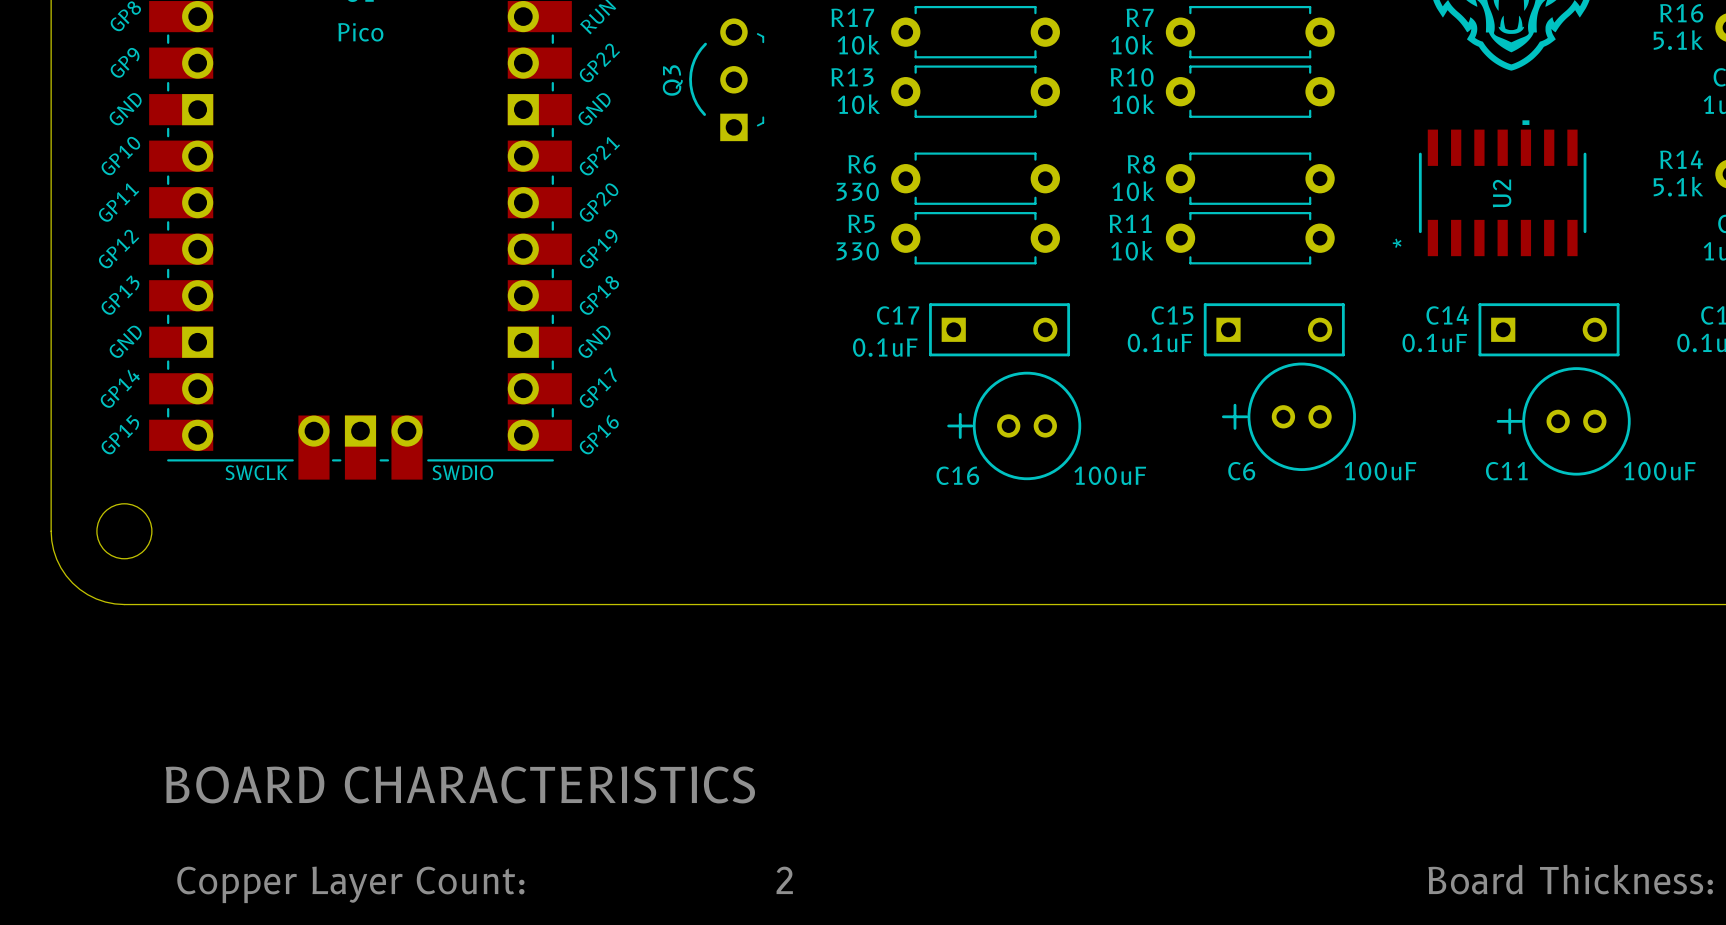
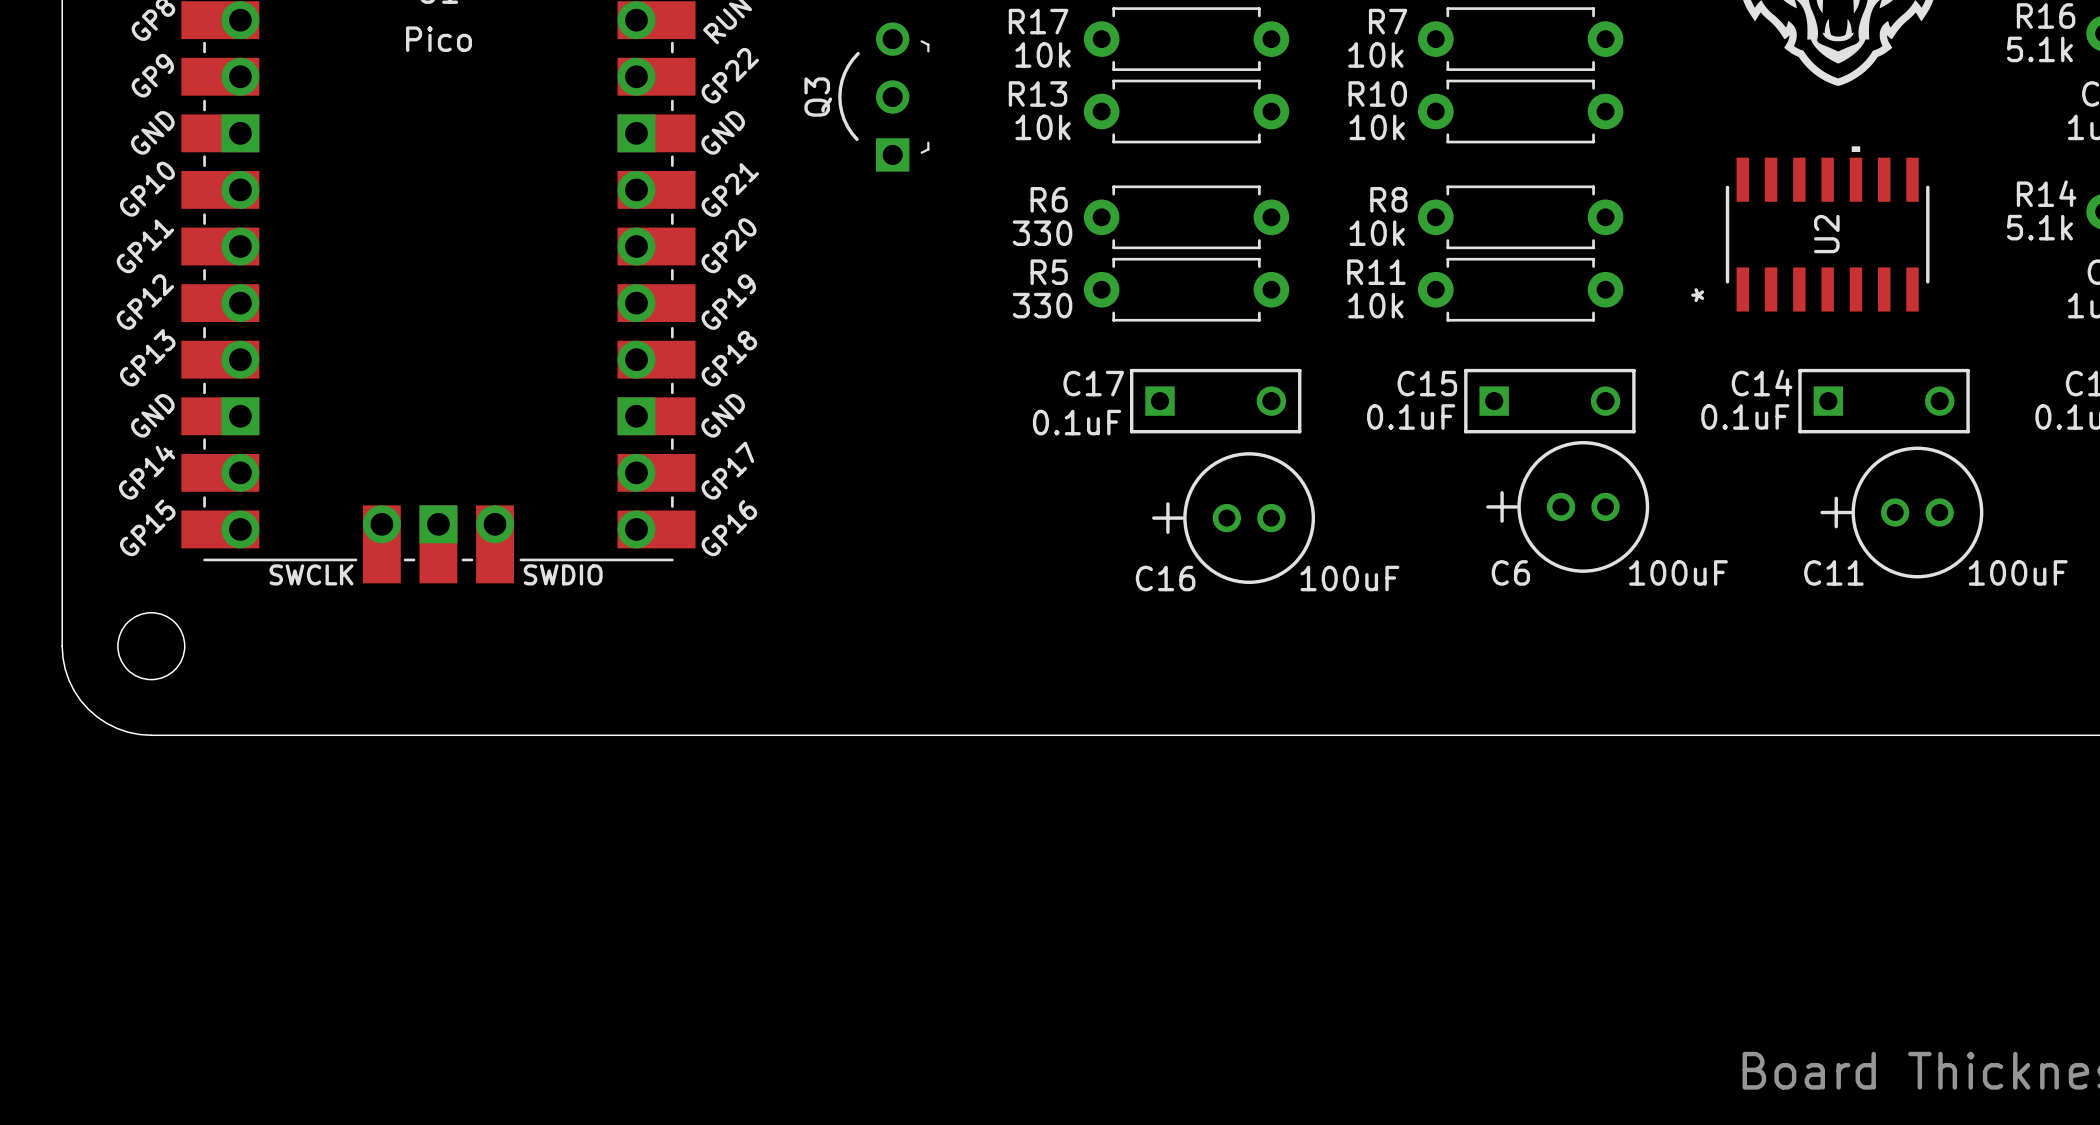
text: BOARD CHARACTERISTICS (460, 784) -> none
text: 2 (784, 880) -> none
text: Copper Layer Count: (350, 884) -> none

